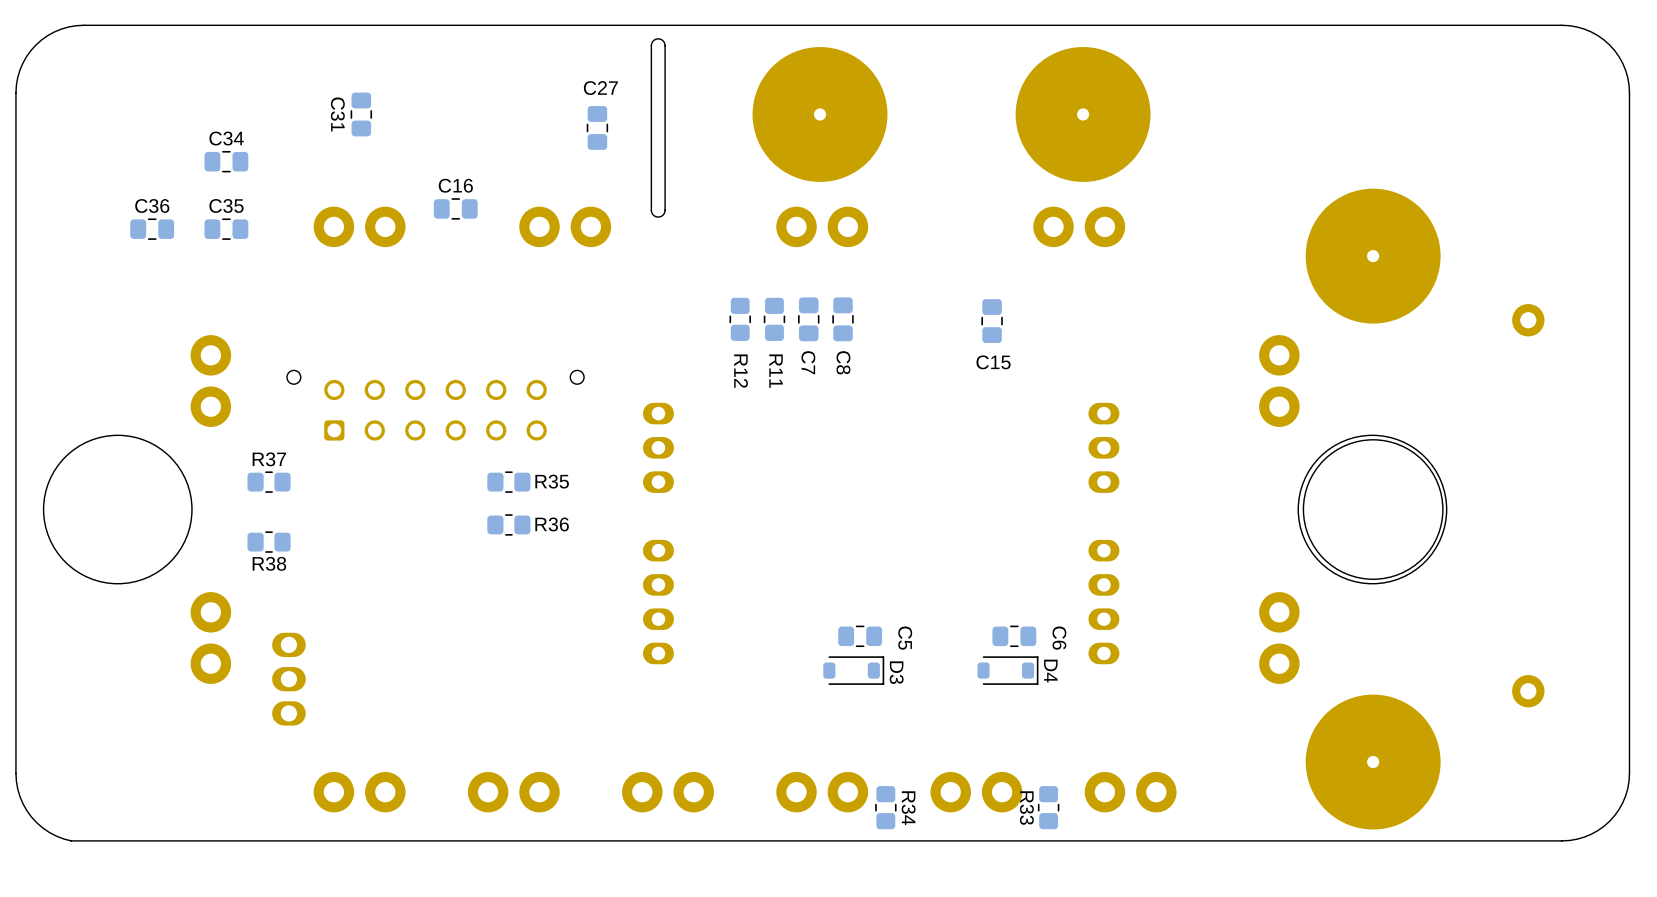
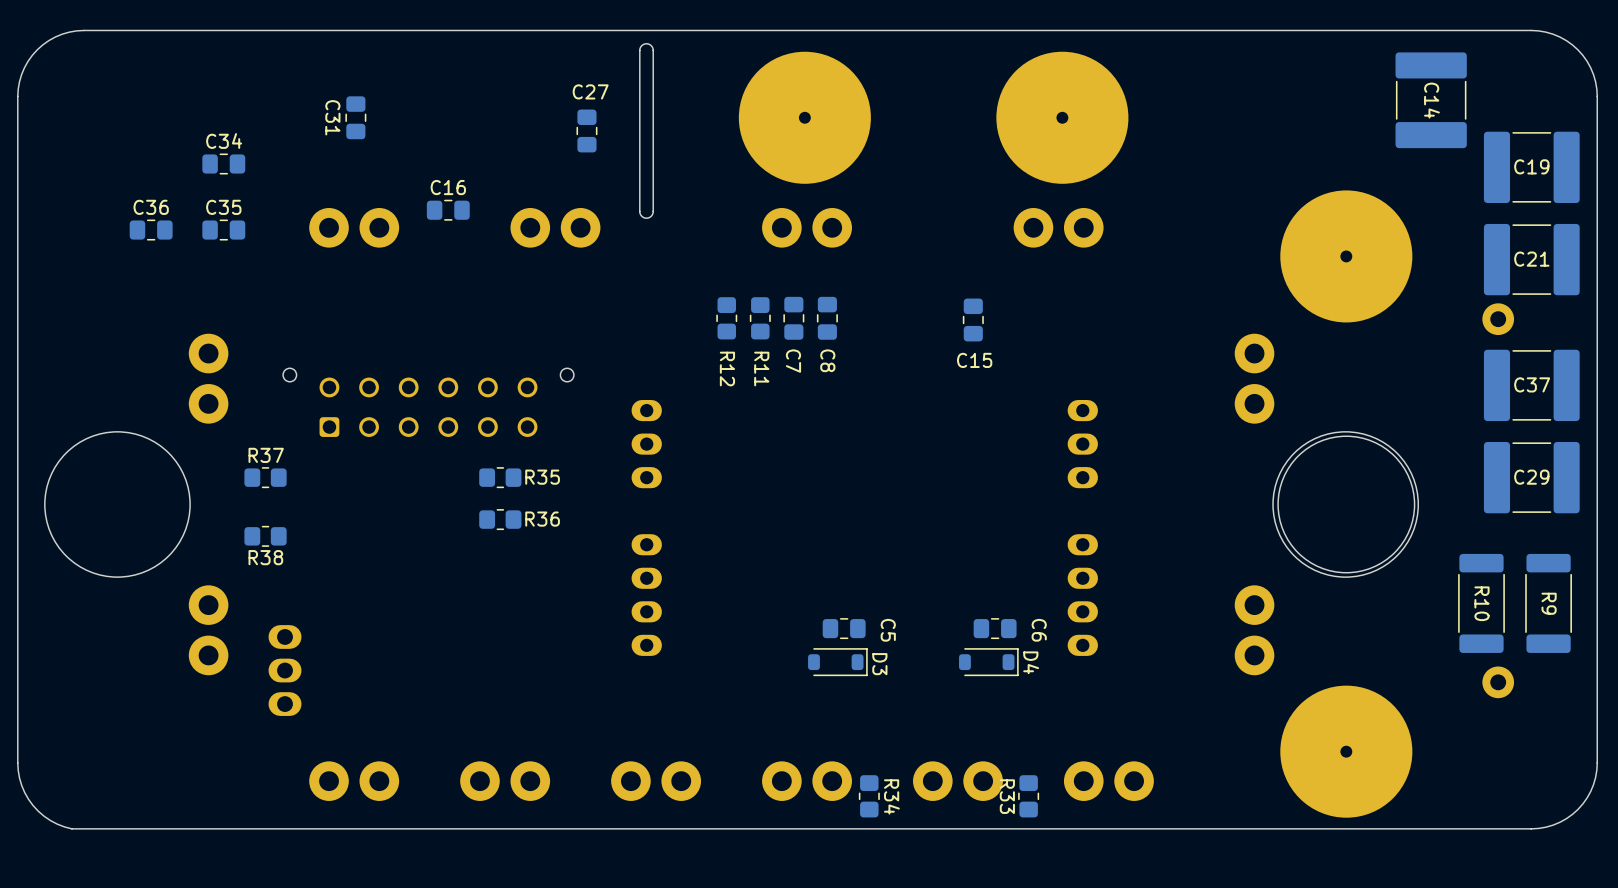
C14: none -> (1431, 100)
C19: none -> (1531, 167)
C21: none -> (1531, 259)
C37: none -> (1531, 385)
C29: none -> (1531, 477)
R10: none -> (1481, 603)
R9: none -> (1548, 603)

